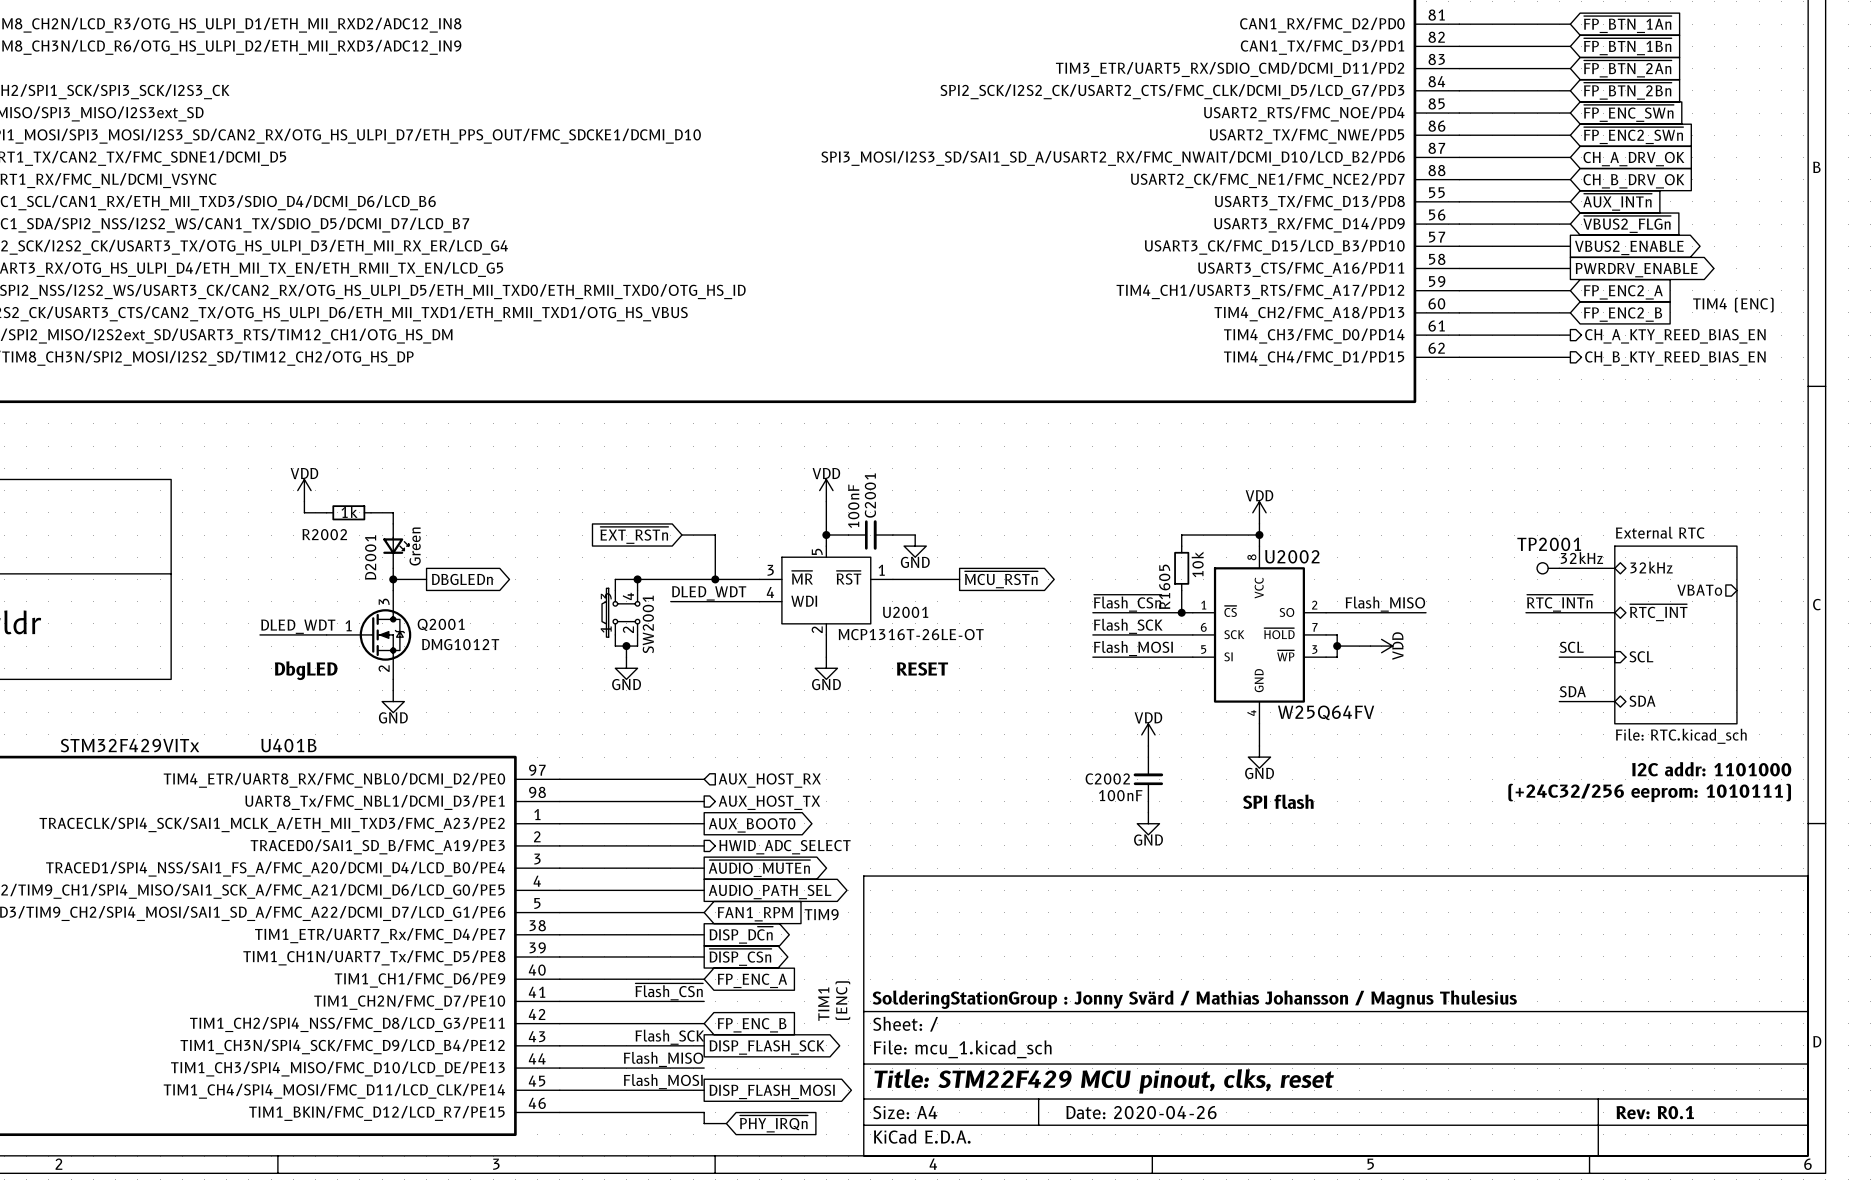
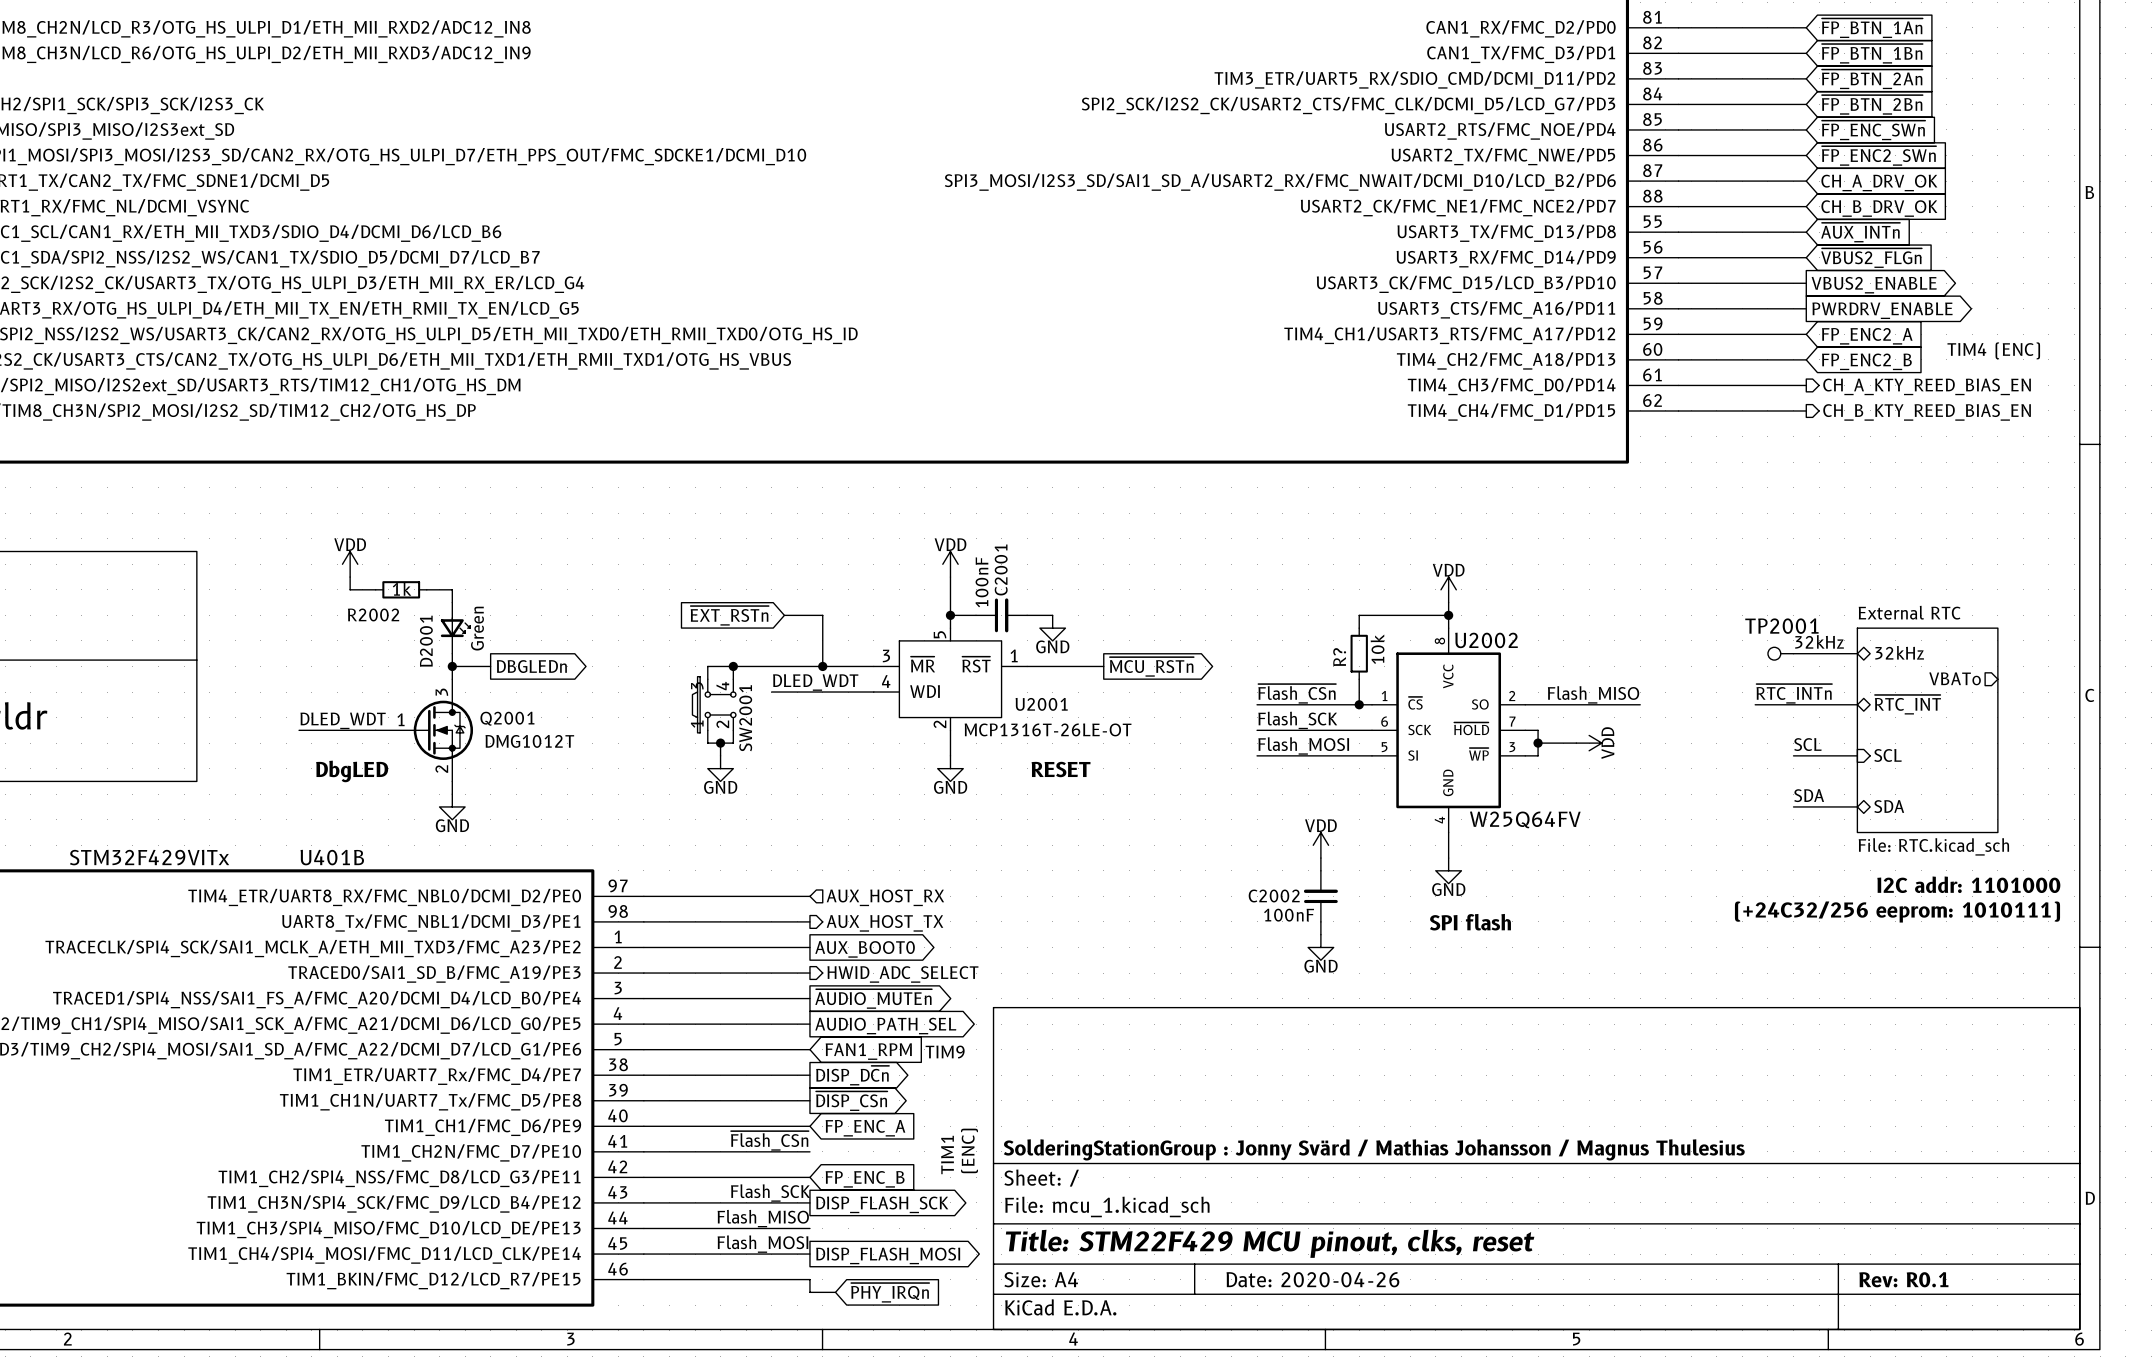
R1605 name: R1605 (1164, 586) -> R? (1339, 657)

